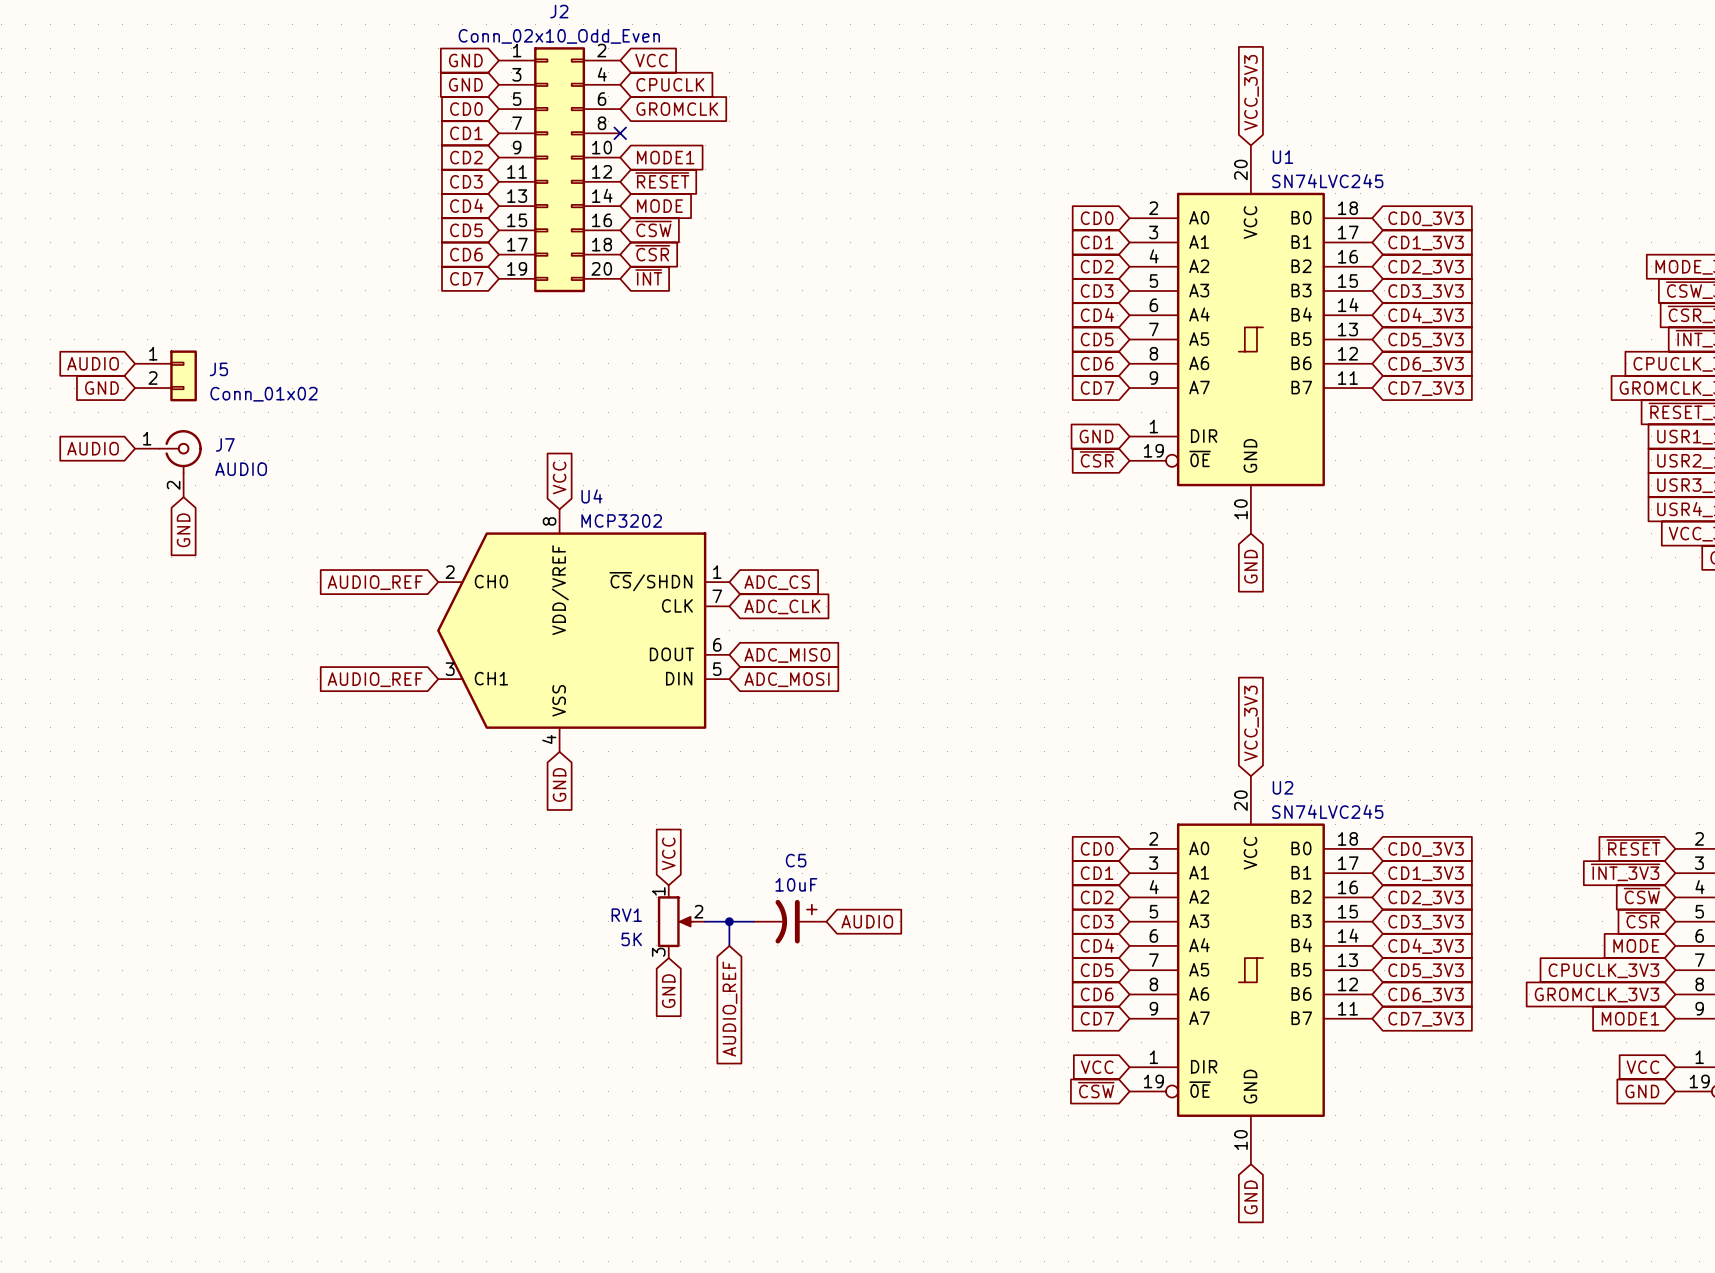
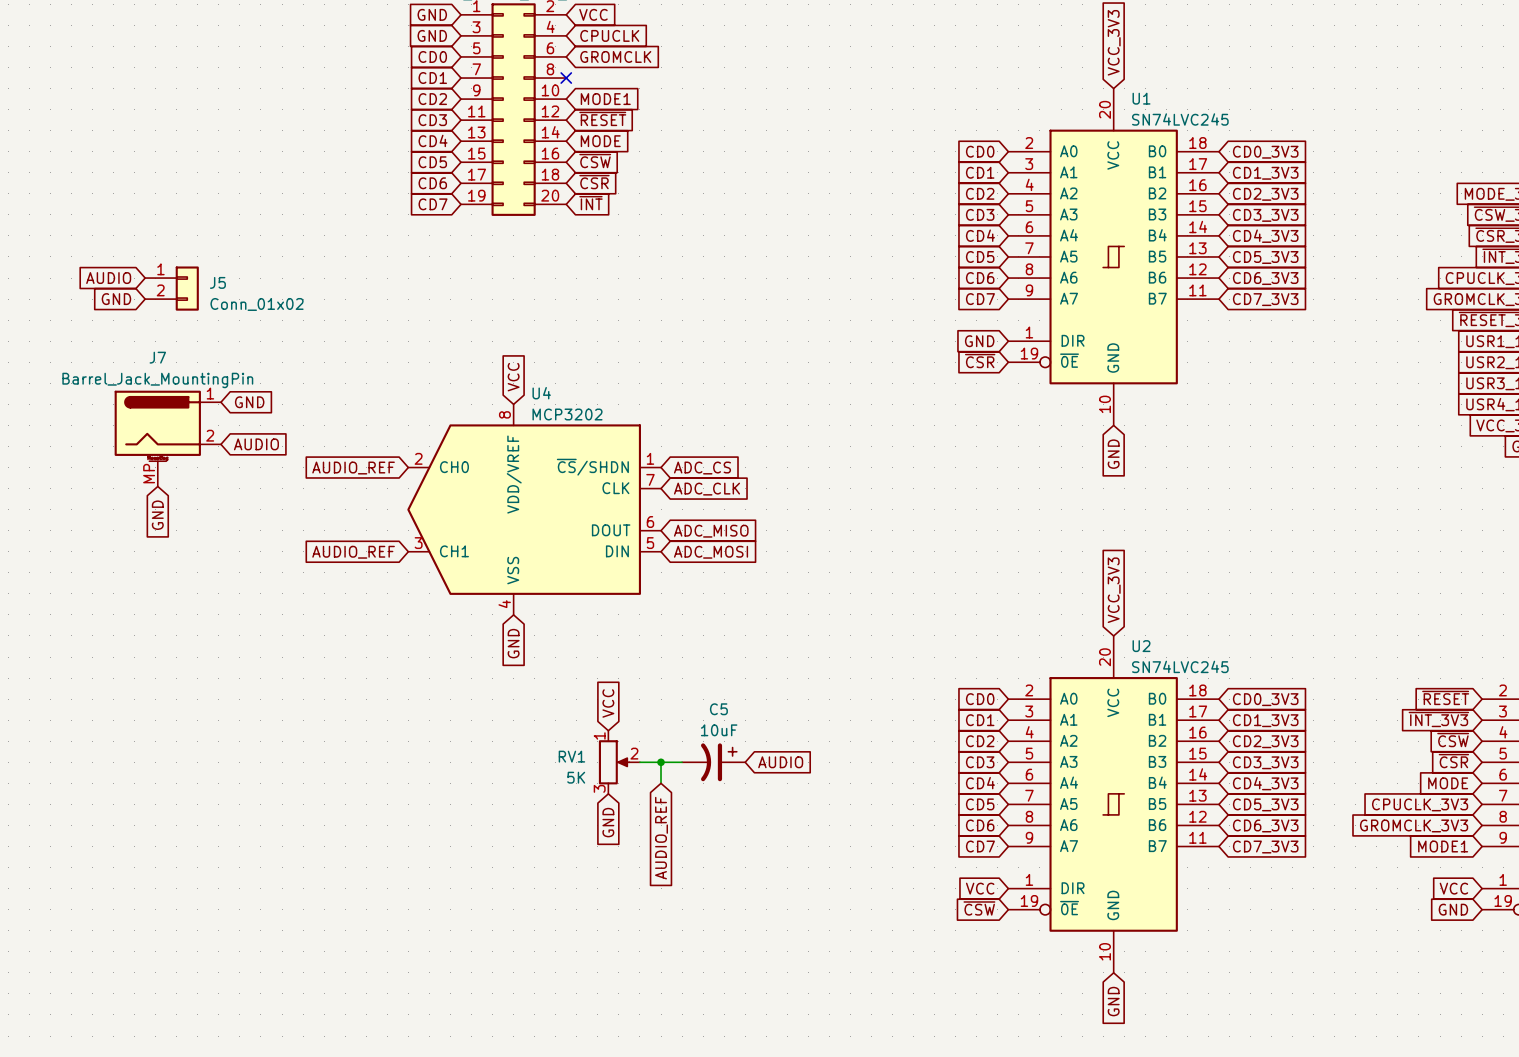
J7 symbol: [135, 430, 202, 498] -> [114, 390, 221, 487]
J7 name position: J7 (225, 444) -> J7 (157, 357)
global label rotation: 0° (93, 448) -> 180° (256, 444)
global label position: AUDIO (93, 448) -> AUDIO (256, 444)
J7 value: AUDIO (241, 469) -> Barrel_Jack_MountingPin (157, 380)
global label rotation: 0° (183, 530) -> 90° counterclockwise (249, 402)
global label position: GND (183, 530) -> GND (249, 402)
global label: none -> GND (157, 515)

